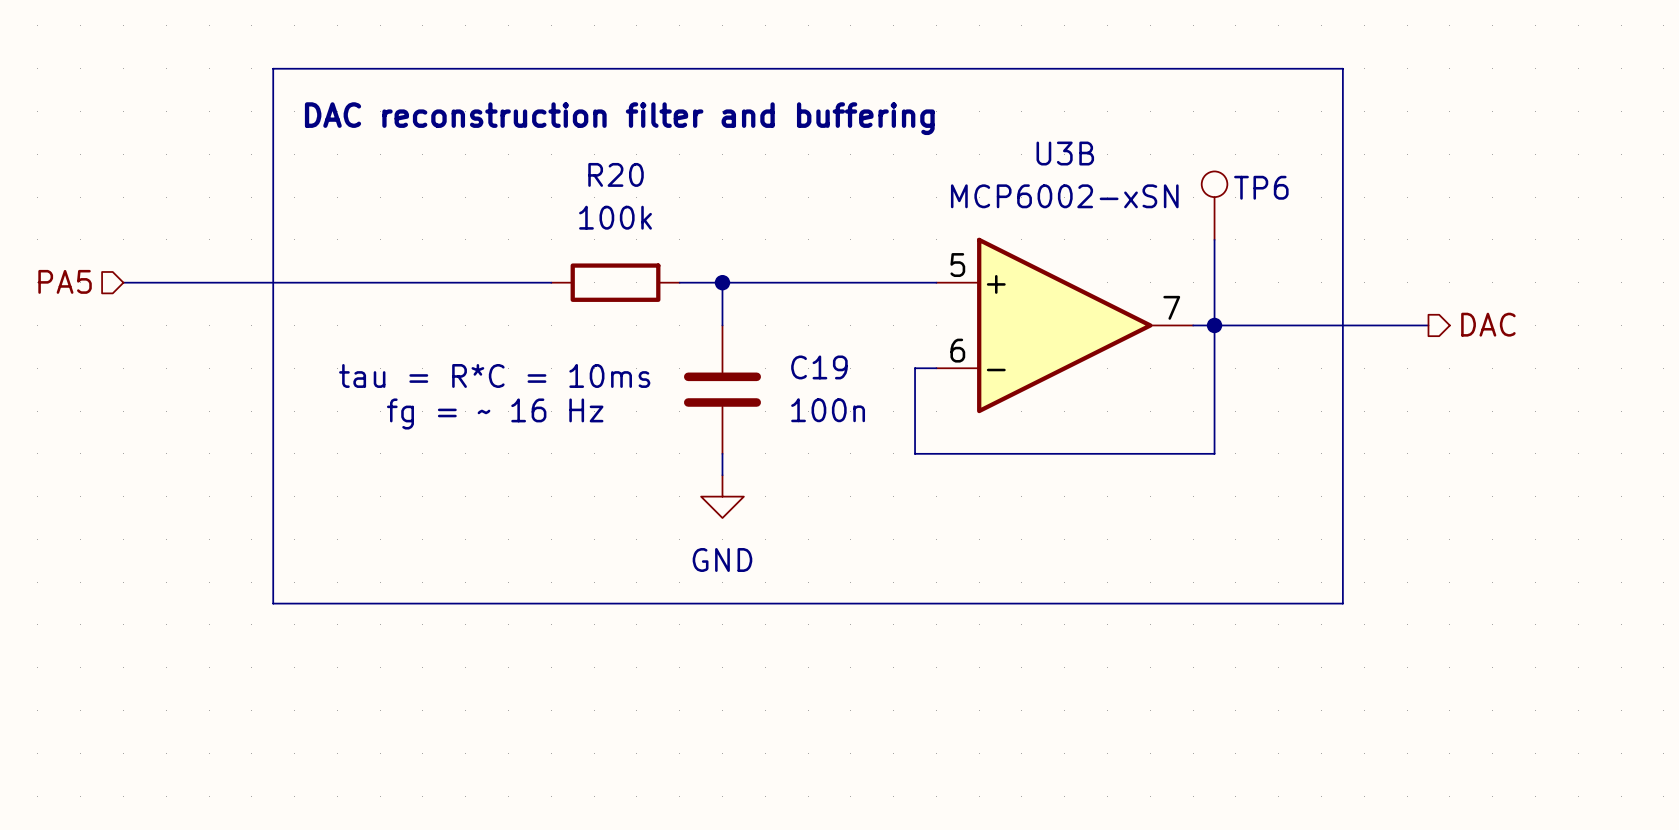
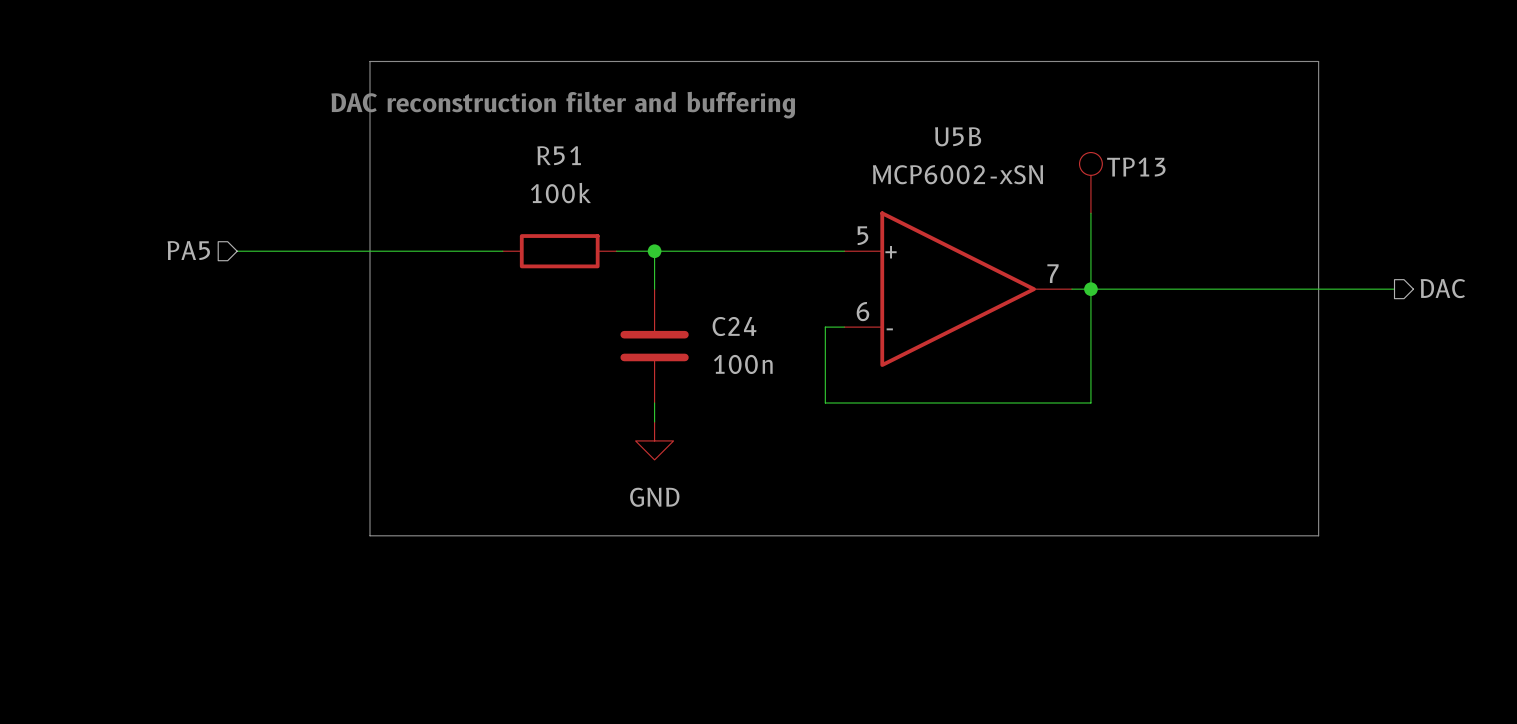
line: (401, 68) (273, 68) (273, 603) (401, 603) -> (369, 61) (369, 535)
line: (1342, 68) (1342, 603) -> (1204, 61) (1318, 61) (1318, 535) (1204, 535)
U3B name: U3B (1065, 153) -> U5B (958, 136)
R20 name: R20 (616, 174) -> R51 (559, 155)
TP6 name: TP6 (1261, 187) -> TP13 (1136, 167)
hierarchical label position: PA5 (65, 281) -> PA5 (188, 250)
wire: (123, 282) (251, 282) -> none
hierarchical label position: DAC (1488, 324) -> DAC (1442, 288)
wire: none -> (1280, 289) (1394, 289)
C19 name: C19 (819, 367) -> C24 (734, 326)
text: tau = R*C = 10ms (494, 375) -> none
text: fg = ~ 16 Hz (495, 413) -> none

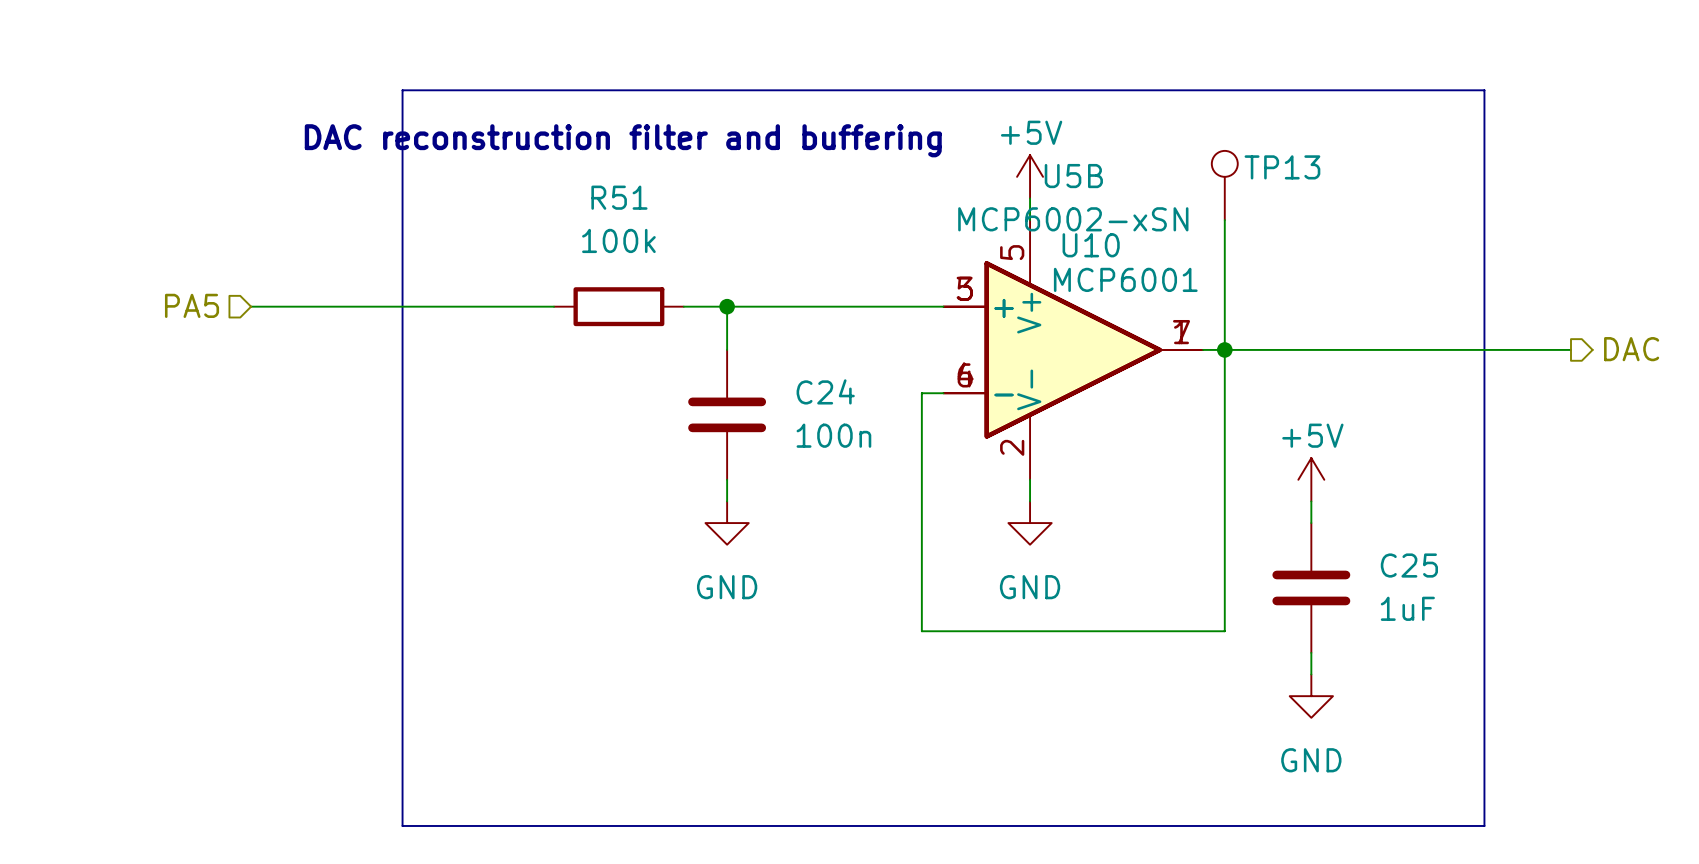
power symbol: none -> +5V (1030, 176)
wire: none -> (1030, 198) (1030, 220)
TP13 position: (1090, 182) -> (1224, 185)
U10: none -> MCP6001 (1073, 349)
wire: (825, 403) (1090, 403) -> (921, 479) (921, 631) (1224, 631) (1224, 479)
wire: none -> (1030, 479) (1030, 501)
power symbol: none -> +5V (1311, 479)
wire: none -> (1311, 501) (1311, 523)
power symbol: none -> GND (1030, 523)
C25: none -> 1uF (1311, 587)
line: (369, 535) (1318, 535) -> (402, 631) (402, 825) (1484, 825) (1484, 631)
wire: none -> (1311, 652) (1311, 674)
power symbol: none -> GND (1311, 696)

